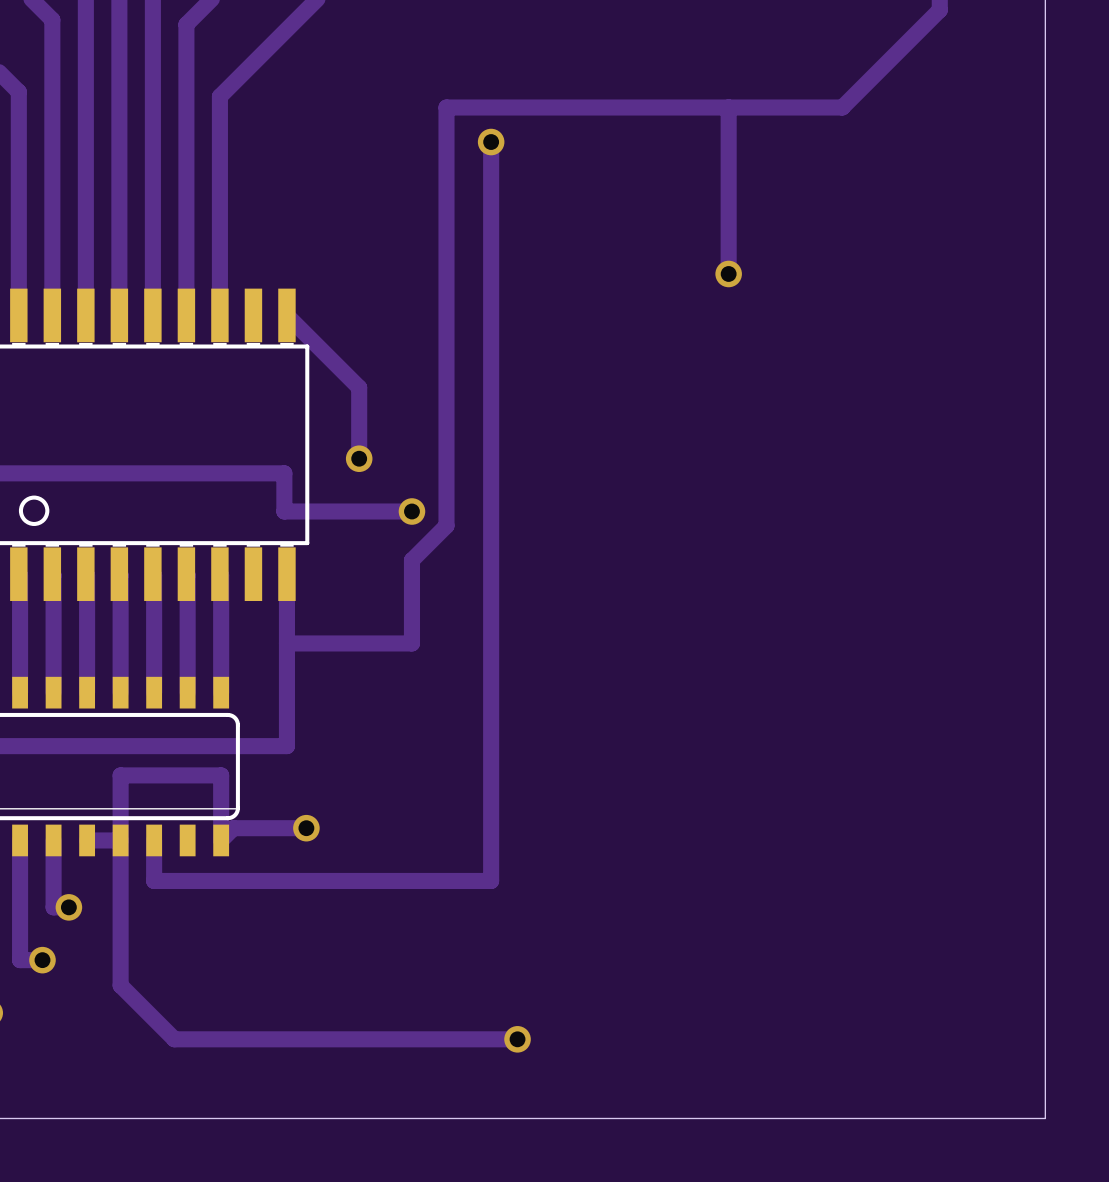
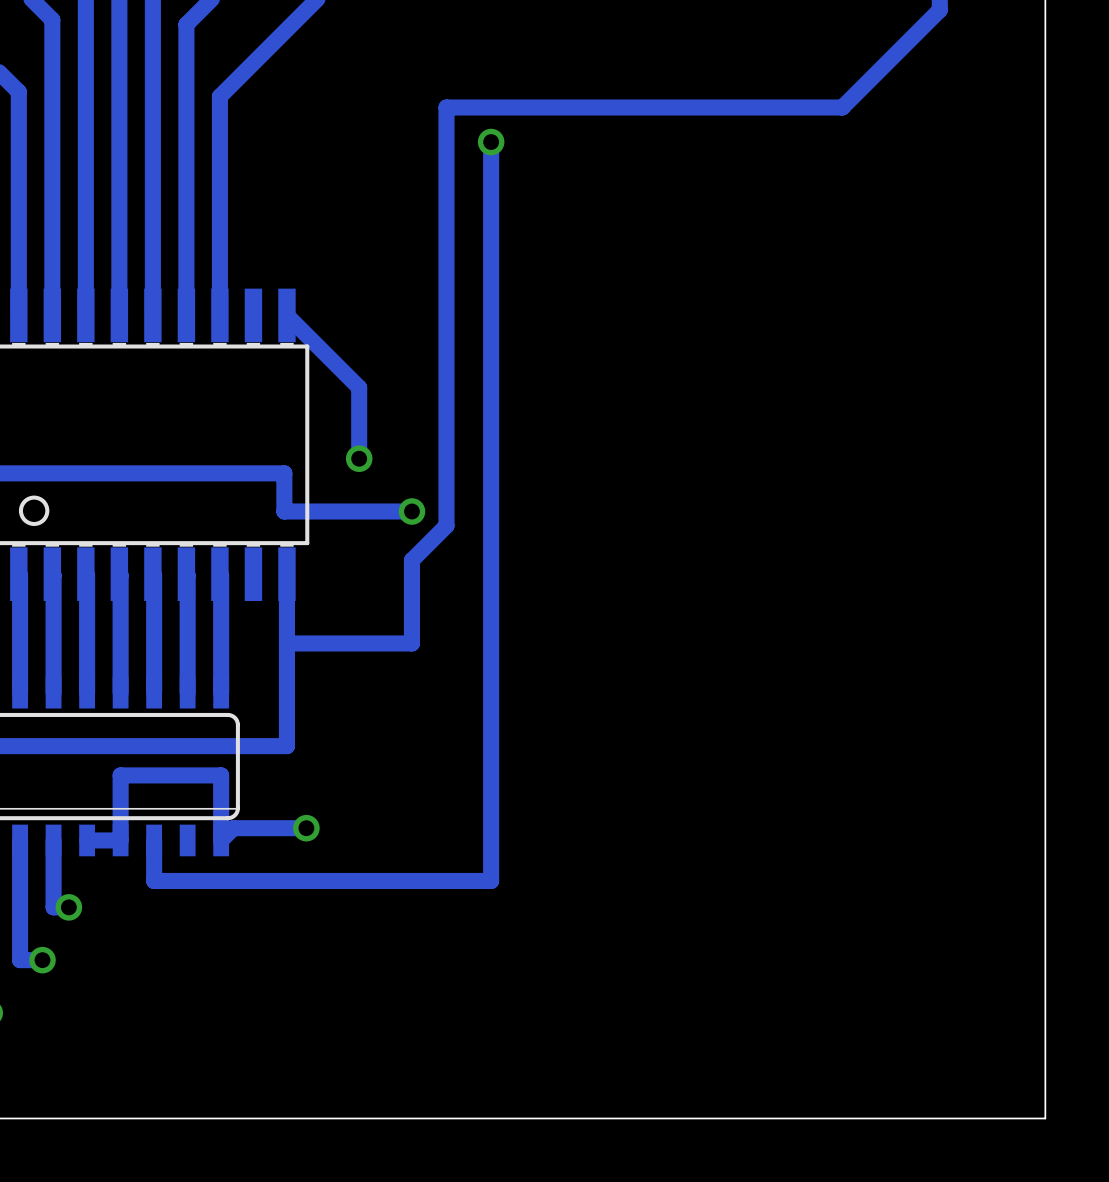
track: (728, 107) (728, 273) -> none
via: (728, 273) -> none
track: (120, 840) (120, 985) (174, 1039) (517, 1039) -> none
via: (517, 1039) -> none

